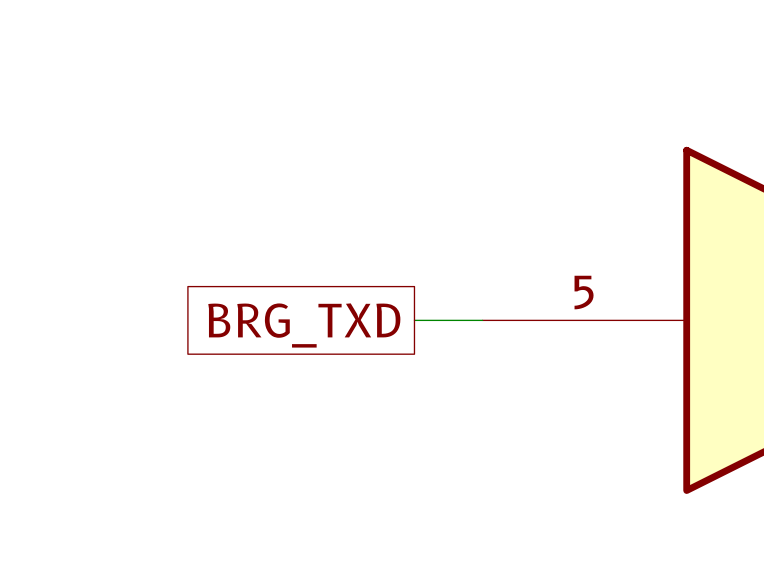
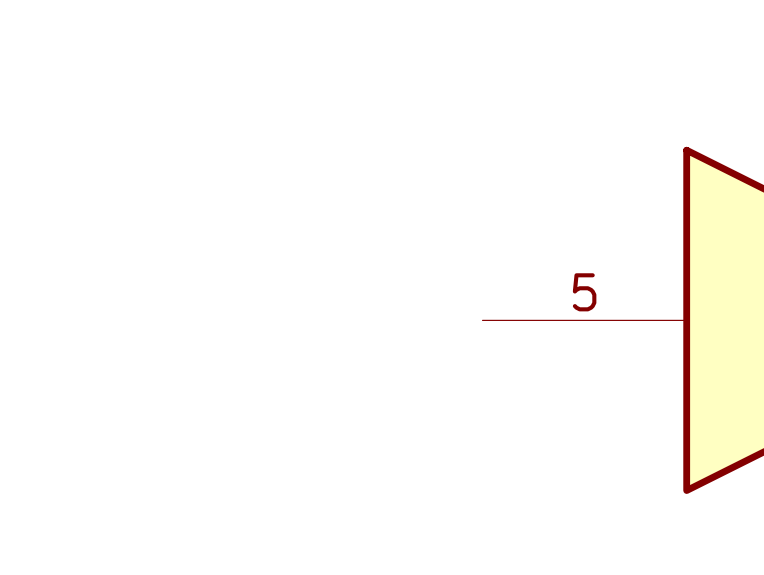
wire: (414, 320) (482, 320) -> none
global label: BRG_TXD (304, 325) -> none

